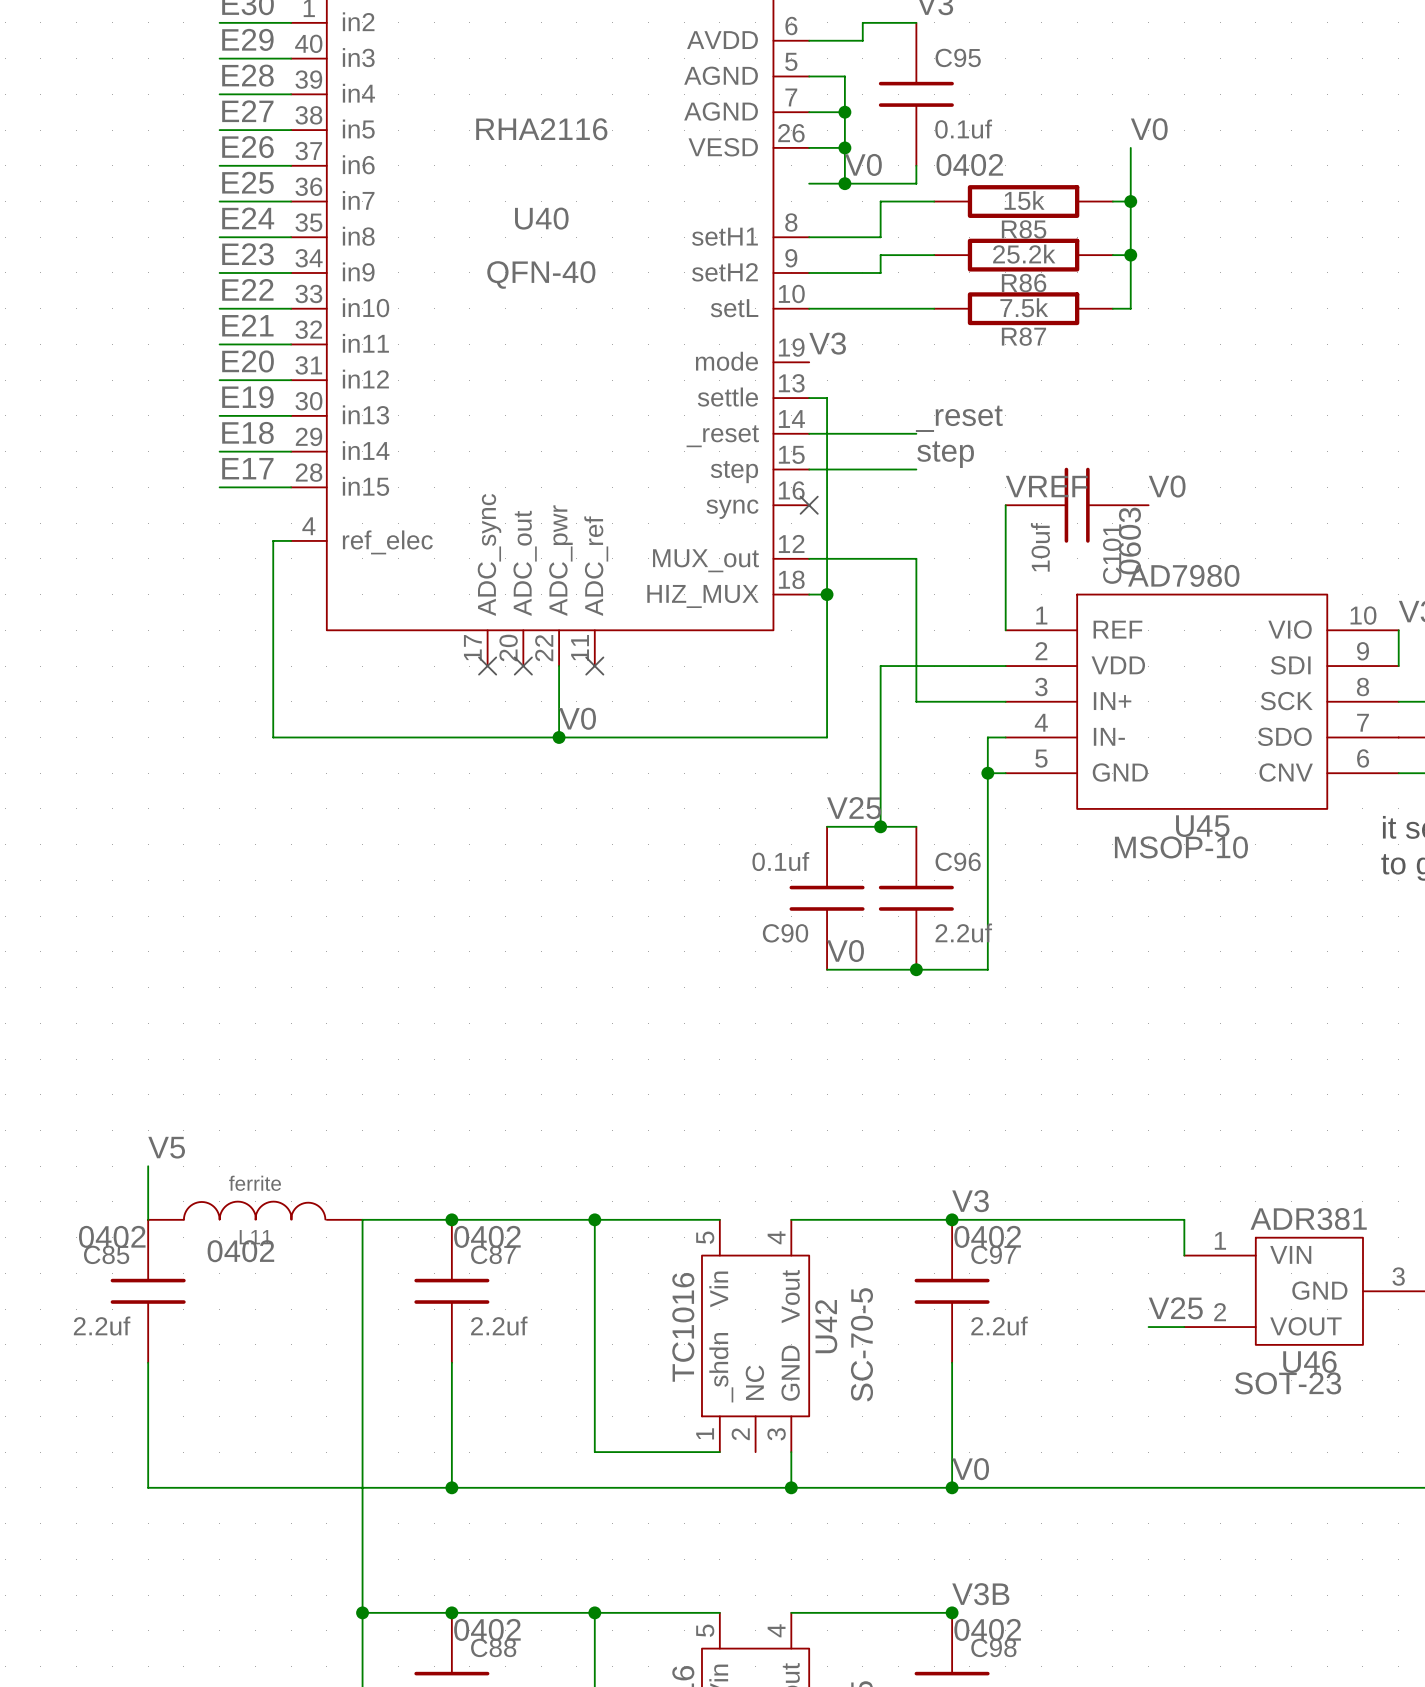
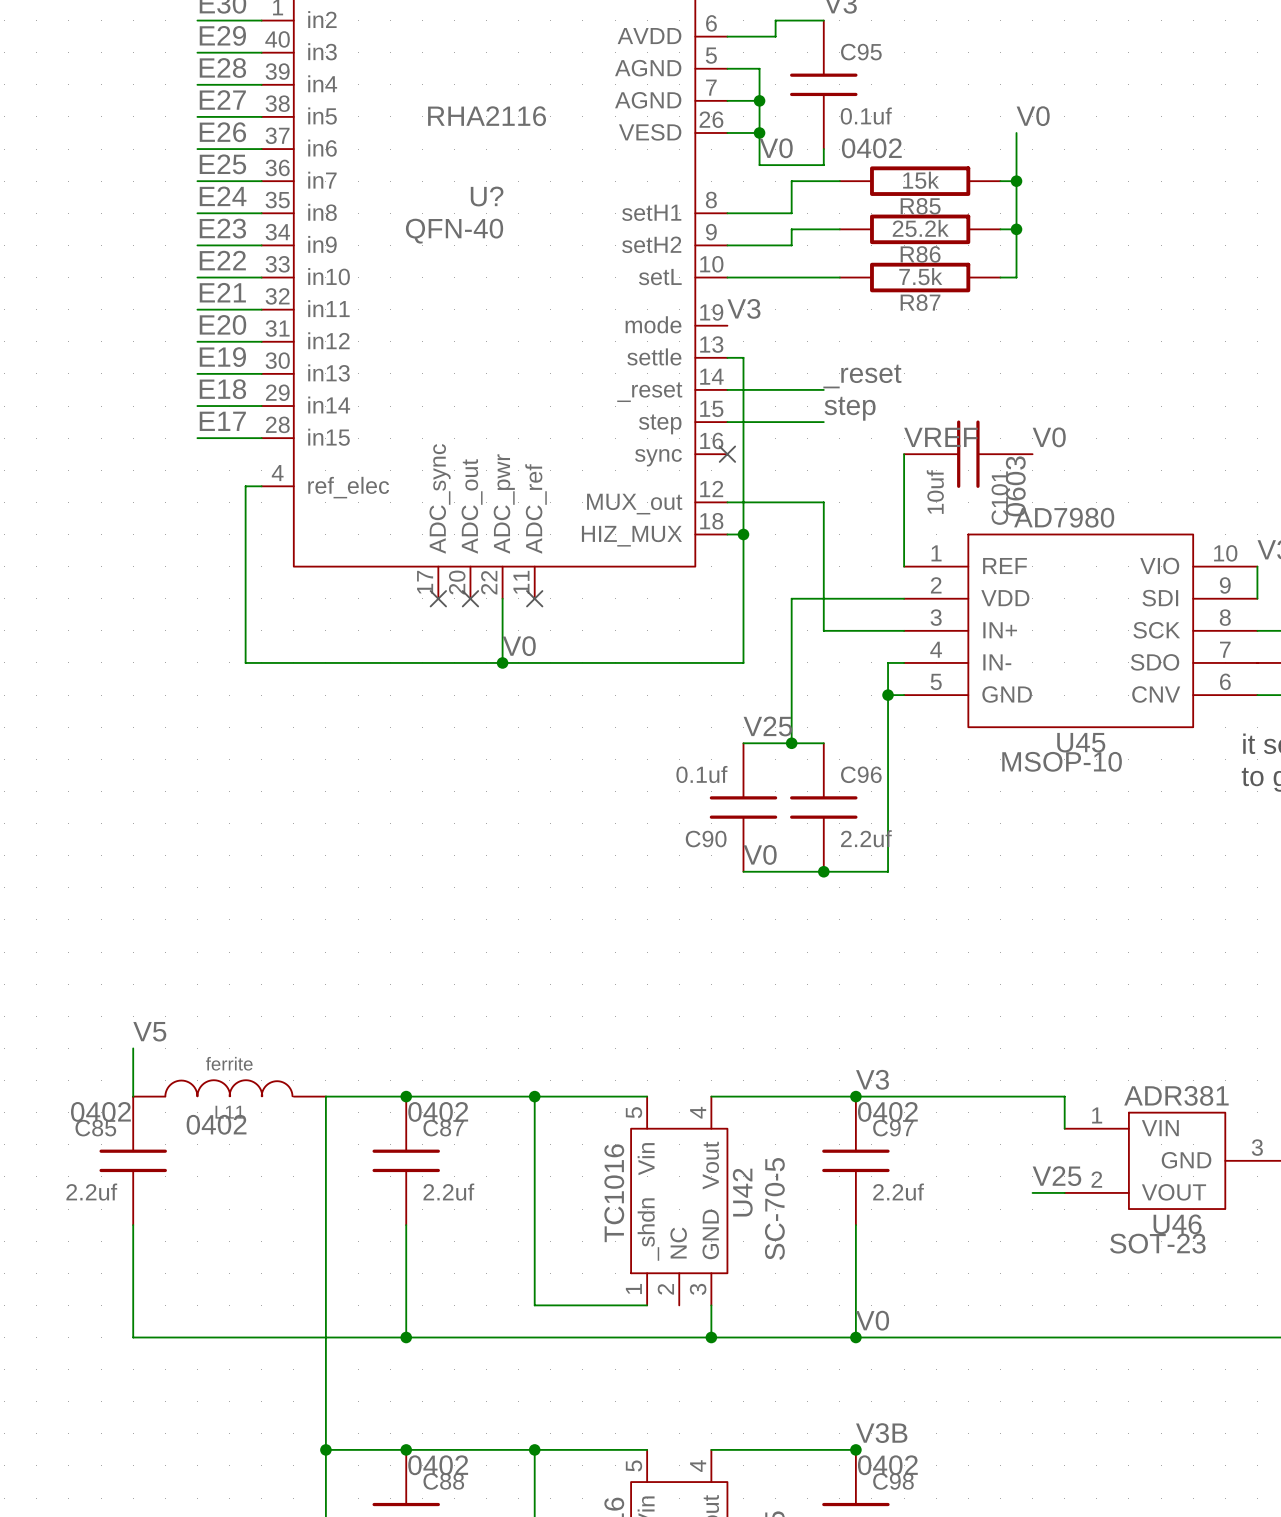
wire: (809, 183) (844, 183) -> none
junction: (844, 183) -> none
U40 name: U40 (541, 218) -> U? (487, 196)
U40 text position: QFN-40 (541, 274) -> QFN-40 (454, 231)

